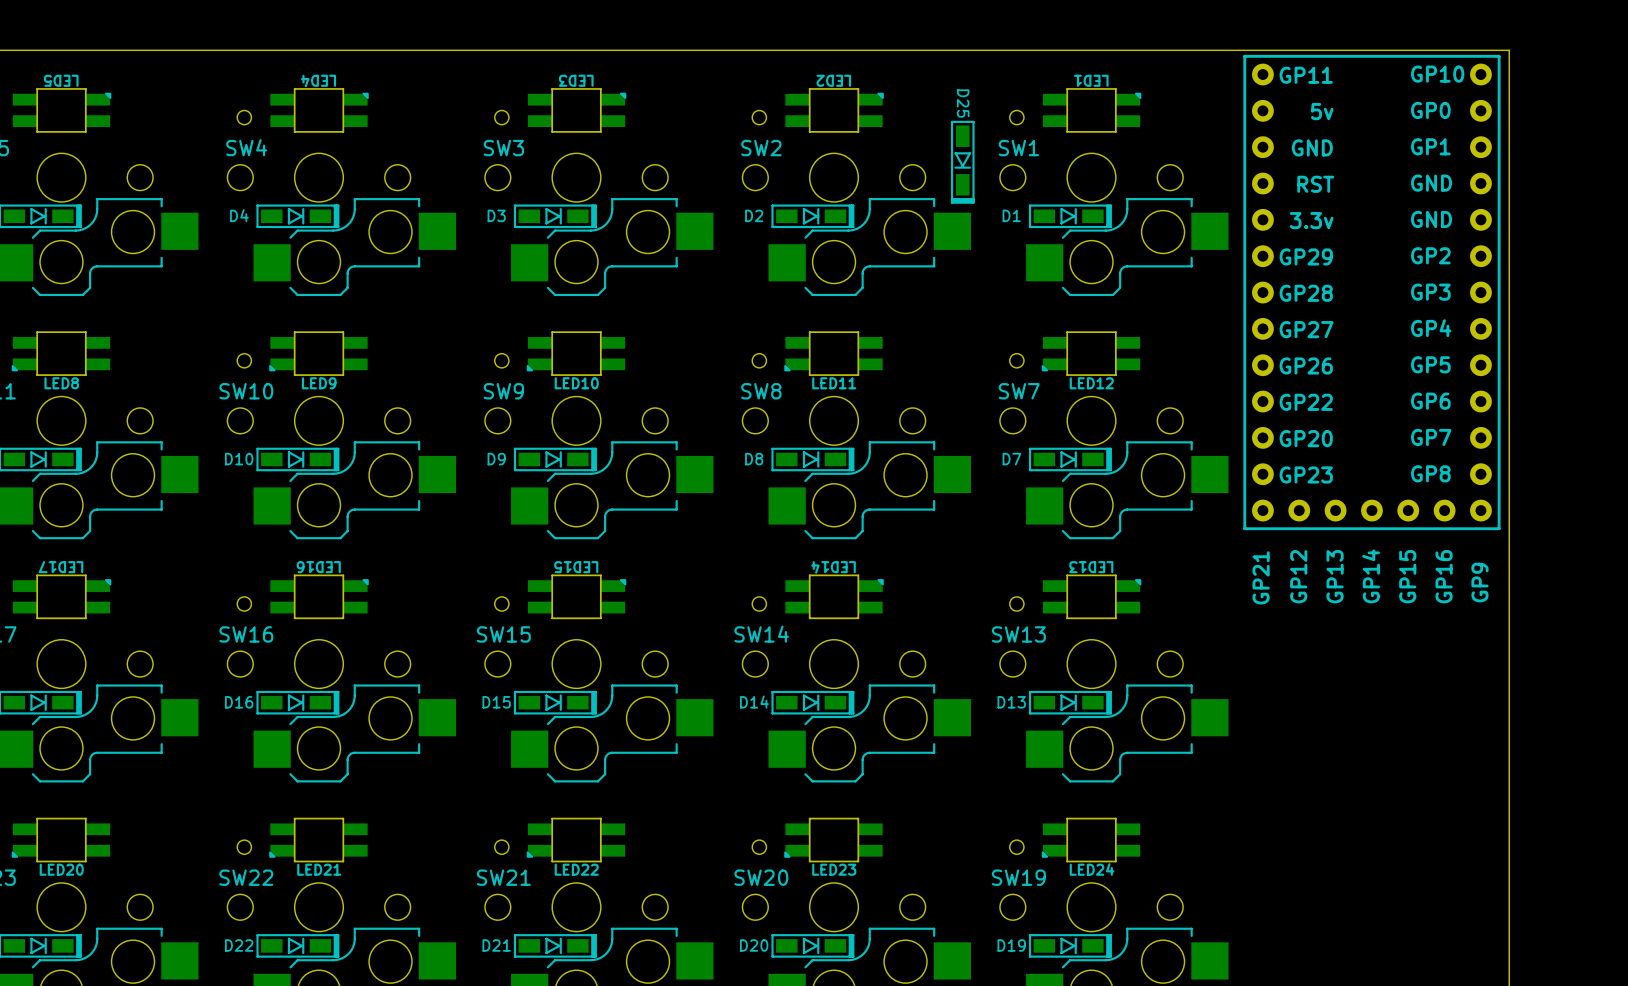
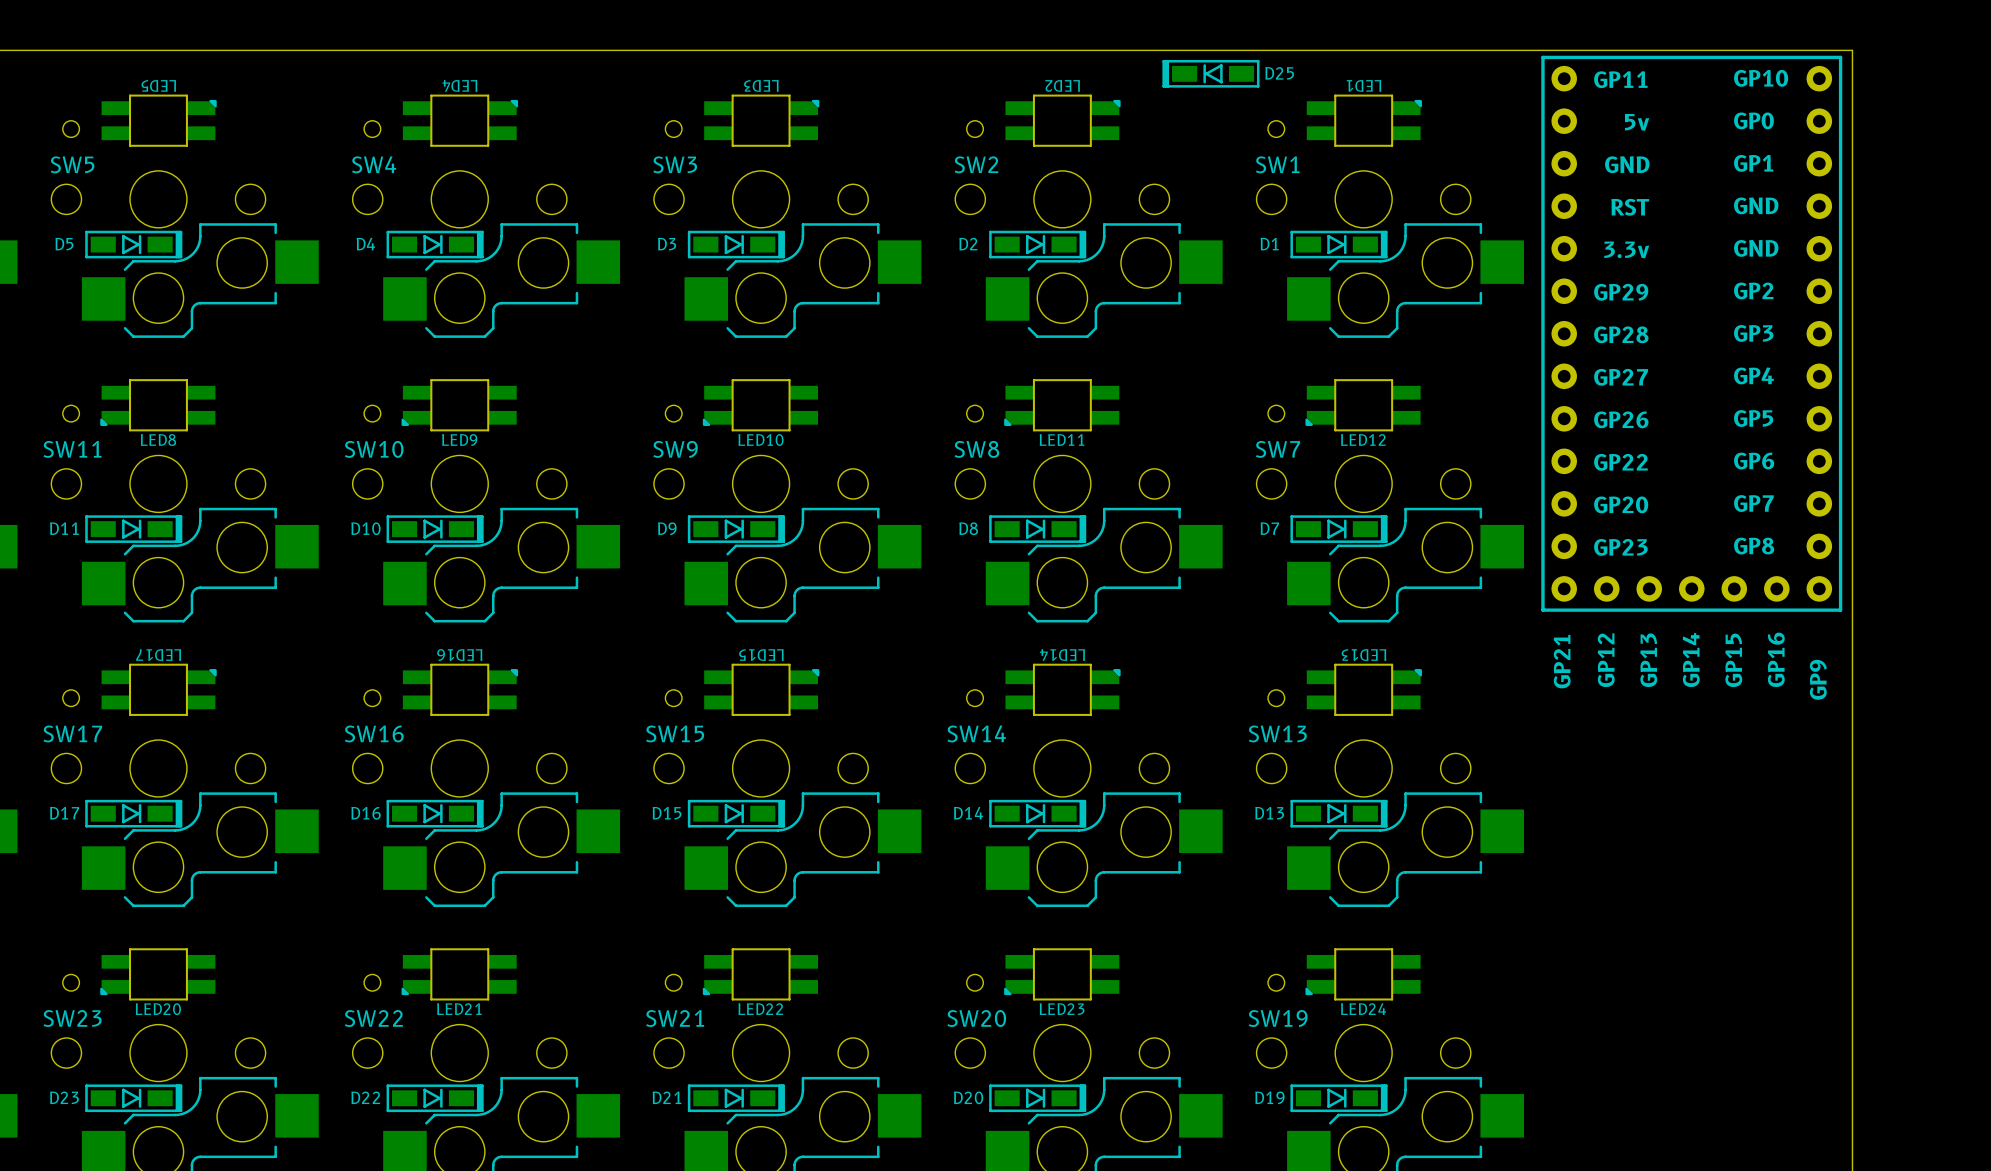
D25 rotation: 0° (962, 162) -> 90° clockwise (1210, 73)
D25 position: (962, 162) -> (1210, 73)

